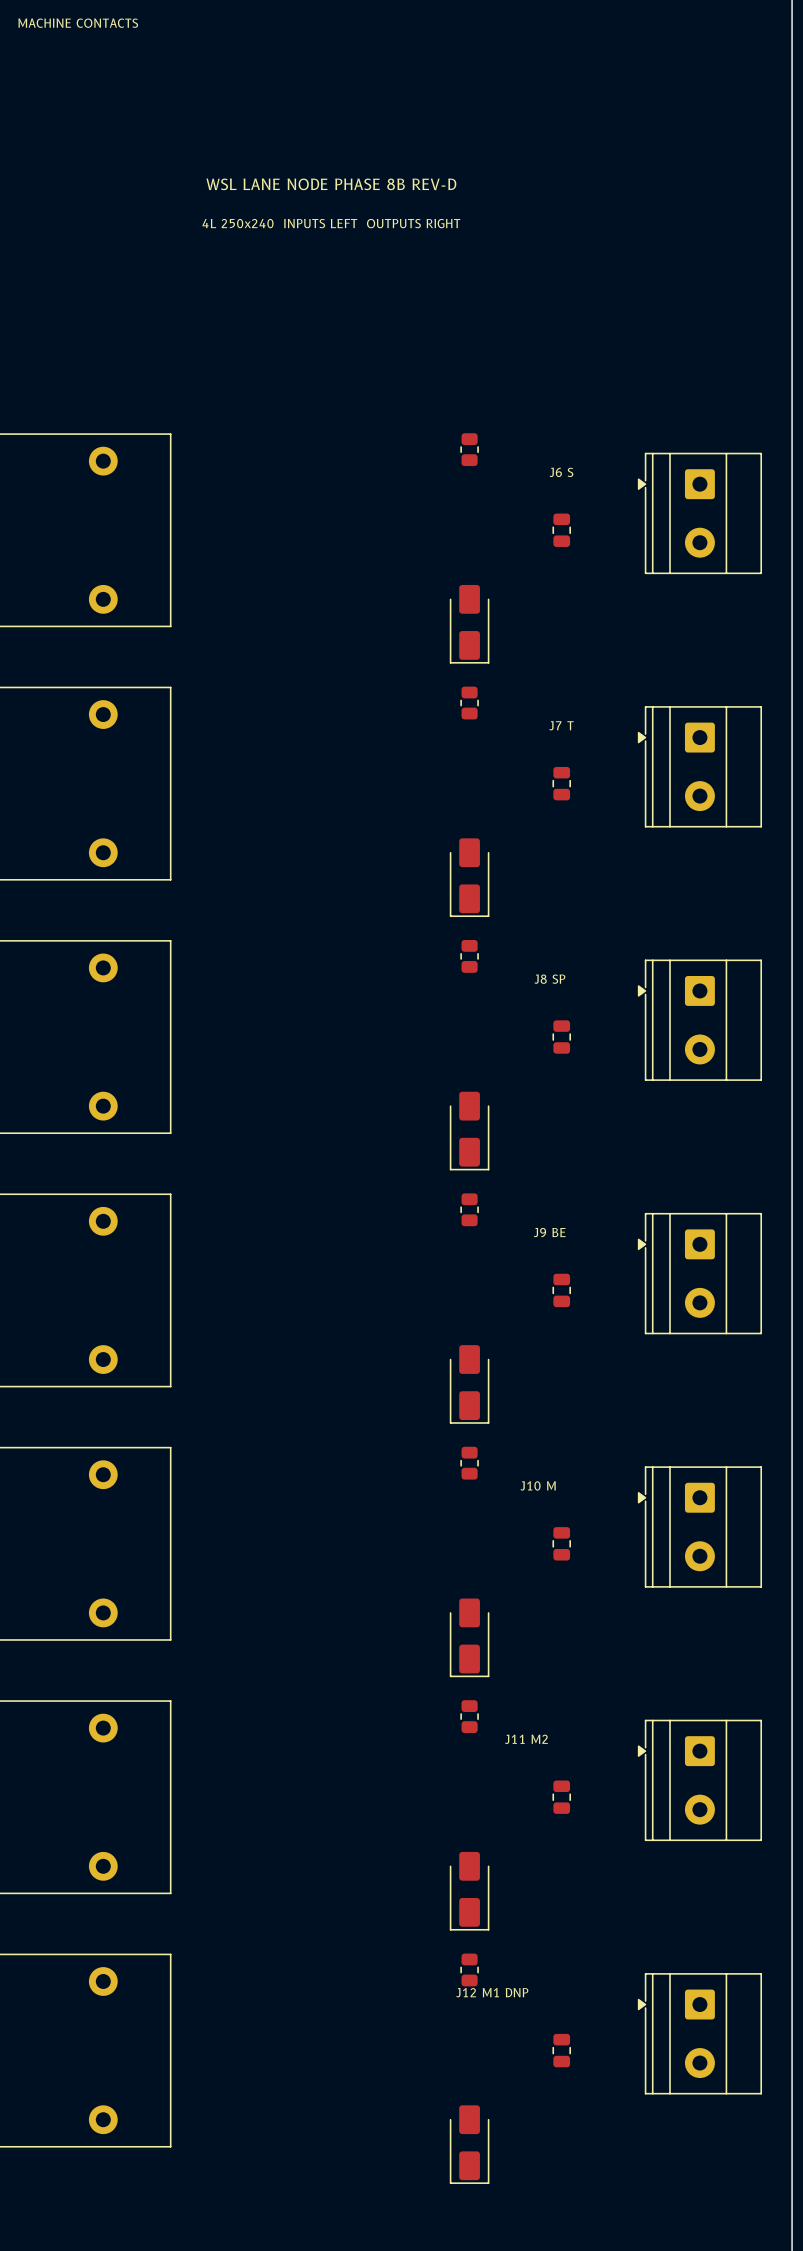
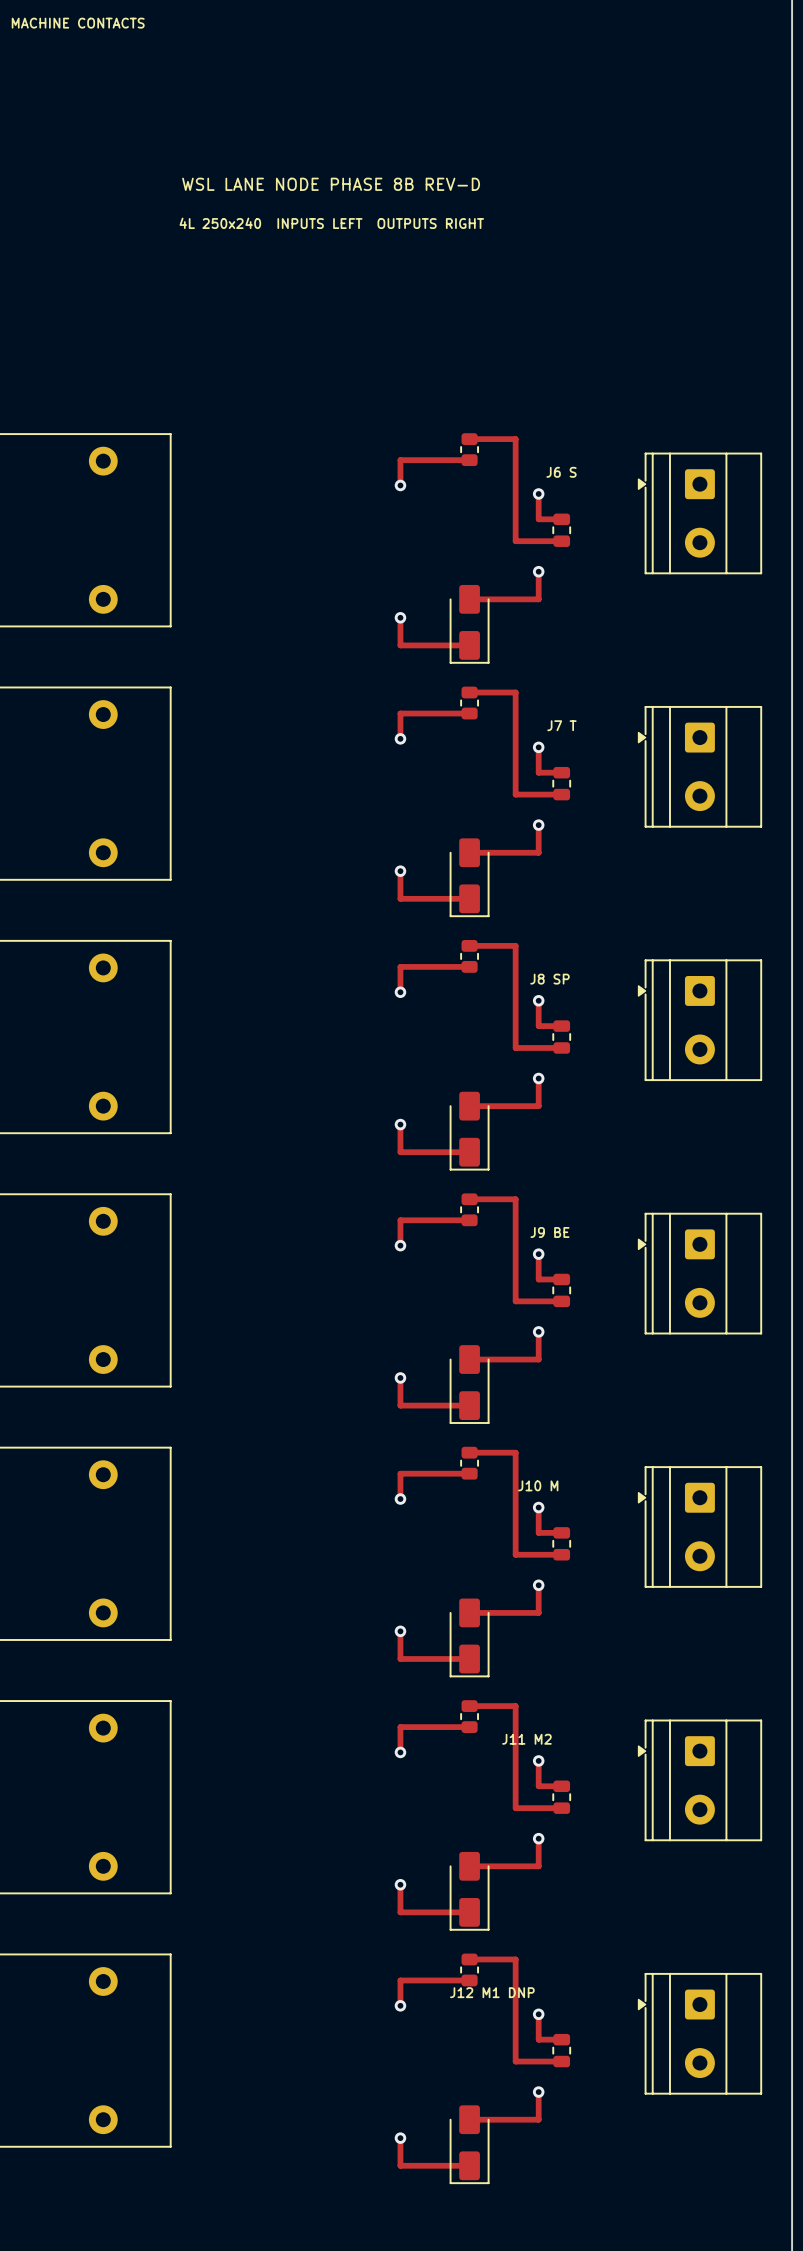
track: none -> (469, 439) (515, 439) (515, 541) (561, 541)
track: none -> (469, 460) (400, 460) (400, 485)
via: none -> (400, 485)
track: none -> (538, 493) (538, 519) (561, 519)
via: none -> (538, 493)
track: none -> (538, 571) (538, 599) (469, 599)
via: none -> (538, 571)
track: none -> (400, 617) (400, 645) (469, 645)
via: none -> (400, 617)
track: none -> (469, 692) (515, 692) (515, 794) (561, 794)
track: none -> (469, 713) (400, 713) (400, 738)
via: none -> (400, 738)
track: none -> (538, 747) (538, 772) (561, 772)
via: none -> (538, 747)
track: none -> (538, 825) (538, 852) (469, 852)
via: none -> (538, 825)
track: none -> (400, 871) (400, 898) (469, 898)
via: none -> (400, 871)
track: none -> (469, 945) (515, 945) (515, 1047) (561, 1047)
track: none -> (469, 966) (400, 966) (400, 992)
via: none -> (400, 992)
track: none -> (538, 1000) (538, 1026) (561, 1026)
via: none -> (538, 1000)
track: none -> (538, 1078) (538, 1106) (469, 1106)
via: none -> (538, 1078)
track: none -> (400, 1124) (400, 1152) (469, 1152)
via: none -> (400, 1124)
track: none -> (469, 1199) (515, 1199) (515, 1301) (561, 1301)
track: none -> (469, 1220) (400, 1220) (400, 1245)
via: none -> (400, 1245)
track: none -> (538, 1254) (538, 1279) (561, 1279)
via: none -> (538, 1254)
track: none -> (538, 1331) (538, 1359) (469, 1359)
via: none -> (538, 1331)
track: none -> (400, 1377) (400, 1405) (469, 1405)
via: none -> (400, 1377)
track: none -> (469, 1452) (515, 1452) (515, 1554) (561, 1554)
track: none -> (469, 1473) (400, 1473) (400, 1499)
via: none -> (400, 1499)
track: none -> (538, 1507) (538, 1532) (561, 1532)
via: none -> (538, 1507)
track: none -> (538, 1585) (538, 1612) (469, 1612)
via: none -> (538, 1585)
track: none -> (400, 1631) (400, 1658) (469, 1658)
via: none -> (400, 1631)
track: none -> (469, 1706) (515, 1706) (515, 1808) (561, 1808)
track: none -> (469, 1727) (400, 1727) (400, 1752)
via: none -> (400, 1752)
track: none -> (538, 1760) (538, 1786) (561, 1786)
via: none -> (538, 1760)
track: none -> (538, 1838) (538, 1866) (469, 1866)
via: none -> (538, 1838)
track: none -> (400, 1884) (400, 1912) (469, 1912)
via: none -> (400, 1884)
track: none -> (469, 1959) (515, 1959) (515, 2061) (561, 2061)
track: none -> (469, 1980) (400, 1980) (400, 2005)
via: none -> (400, 2005)
track: none -> (538, 2014) (538, 2039) (561, 2039)
via: none -> (538, 2014)
track: none -> (538, 2092) (538, 2119) (469, 2119)
via: none -> (538, 2092)
track: none -> (400, 2138) (400, 2165) (469, 2165)
via: none -> (400, 2138)

